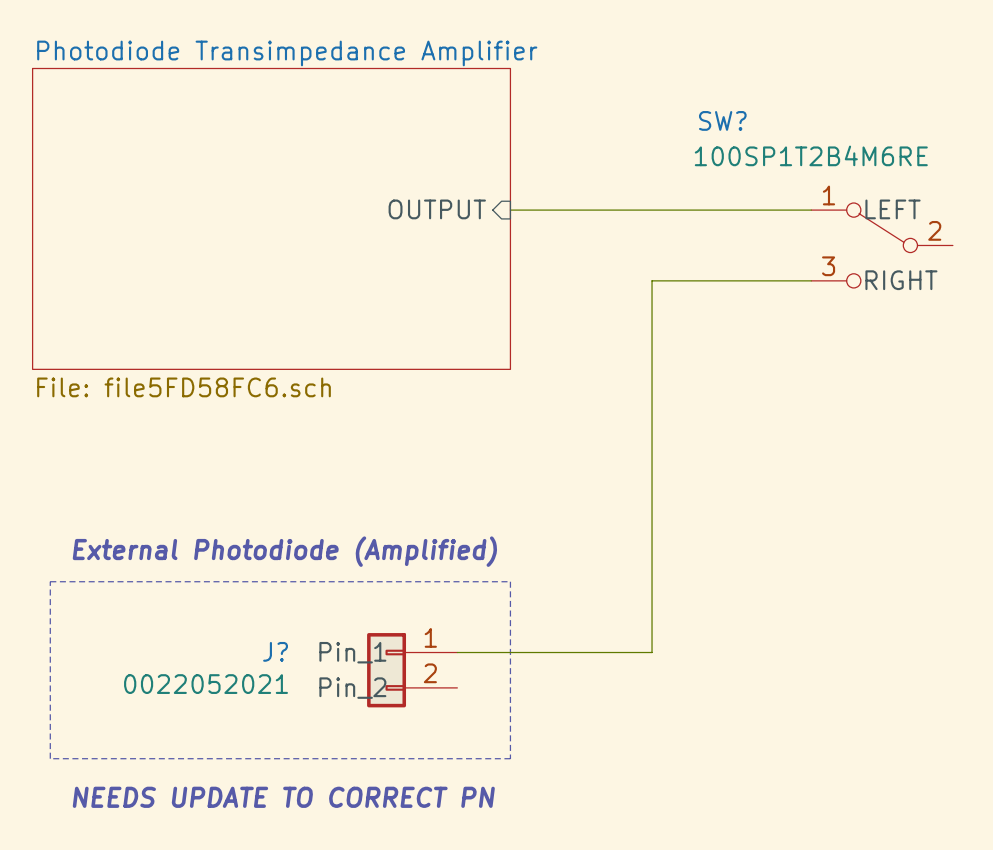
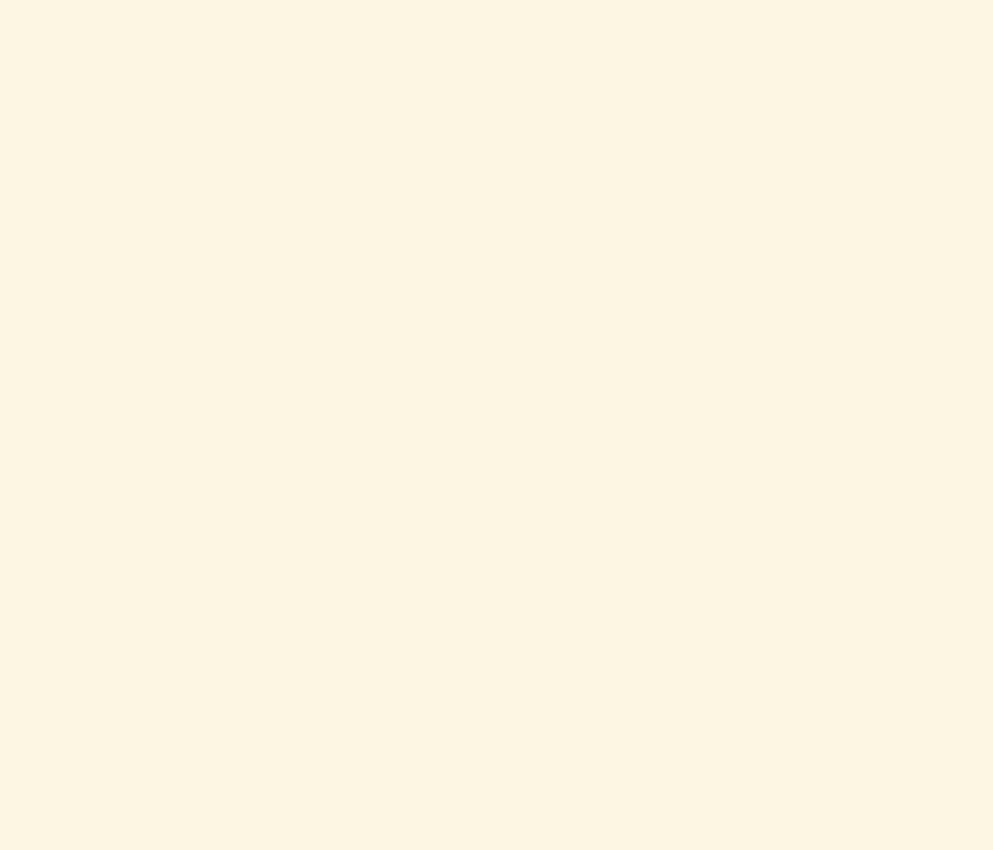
sheet pin: OUTPUT (437, 209) -> none
wire: (510, 210) (811, 210) -> none
sheet Photodiode Transimpedance Amplifier: File: file5FD58FC6.sch (271, 218) -> none
SW?: 100SP1T2B4M6RE (882, 245) -> none
wire: (811, 280) (652, 280) (652, 652) (457, 652) -> none
text: External Photodiode (Amplified) (284, 551) -> none
line: (50, 581) (510, 581) (510, 758) (50, 758) (50, 581) -> none
J?: 0022052021 (412, 670) -> none
text: NEEDS UPDATE TO CORRECT PN (283, 797) -> none

